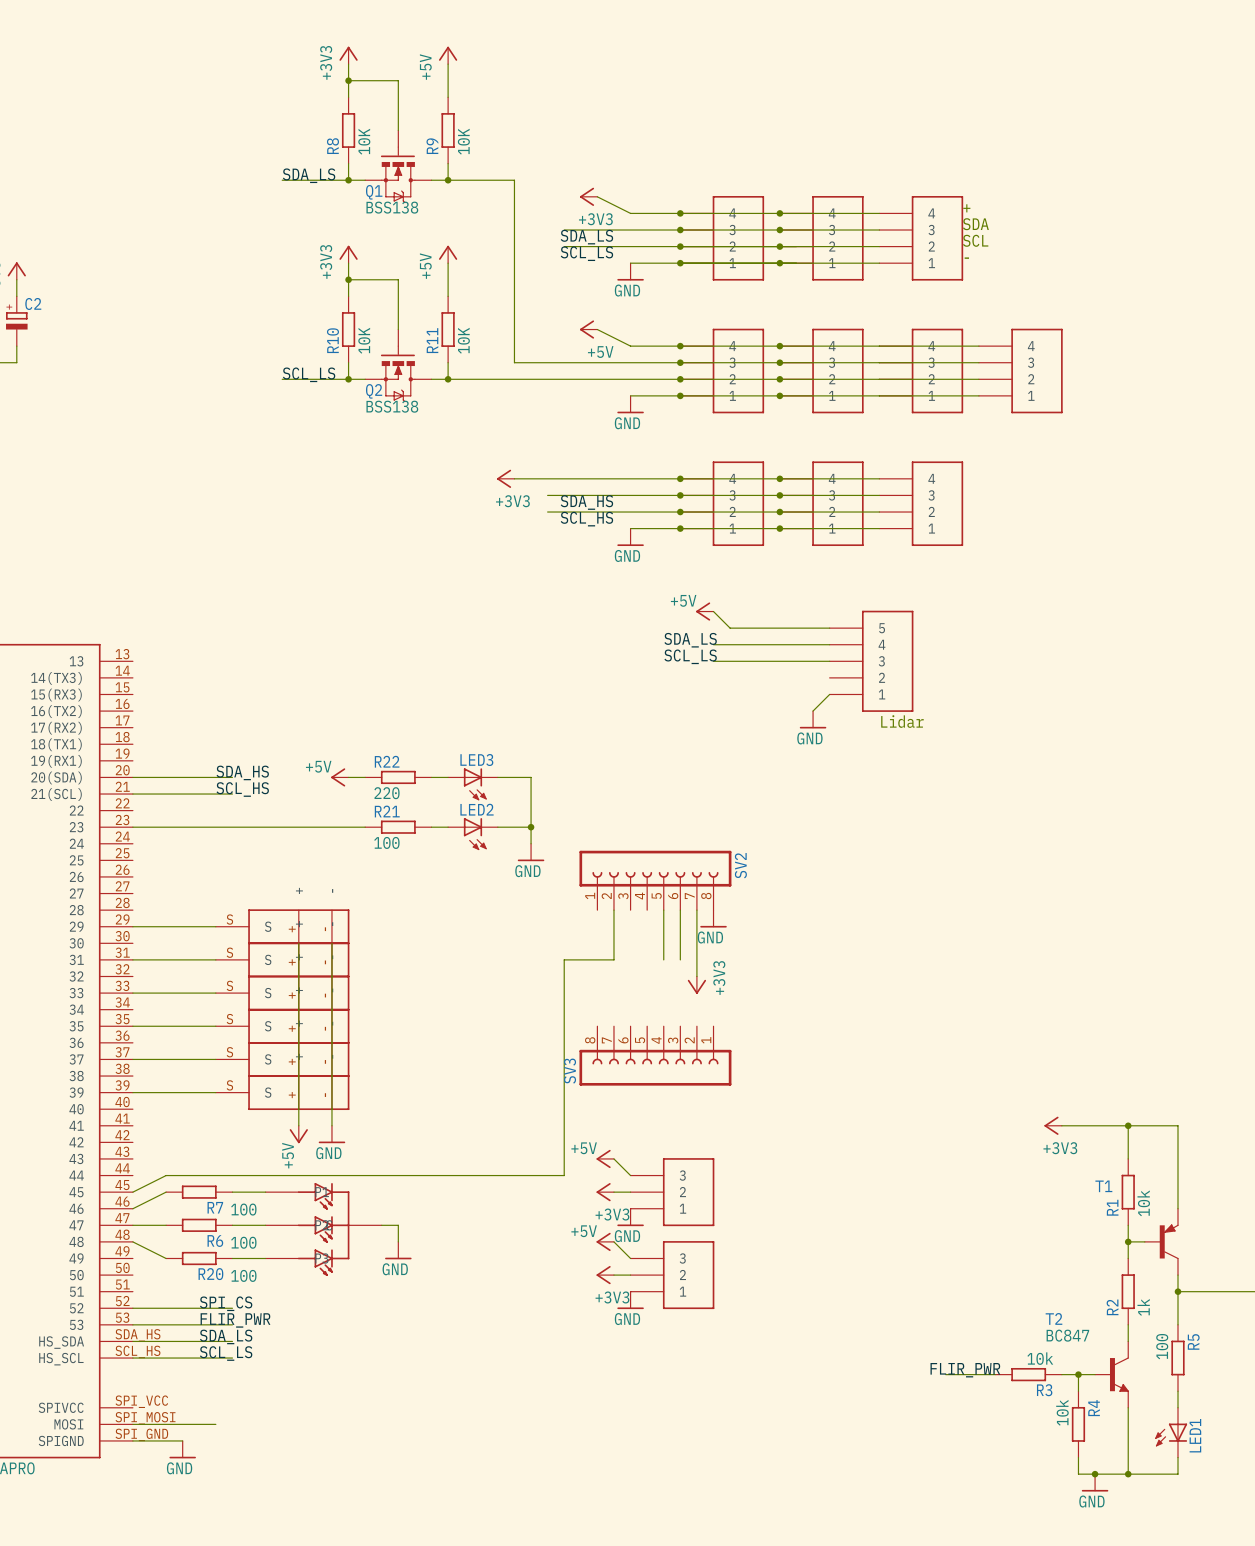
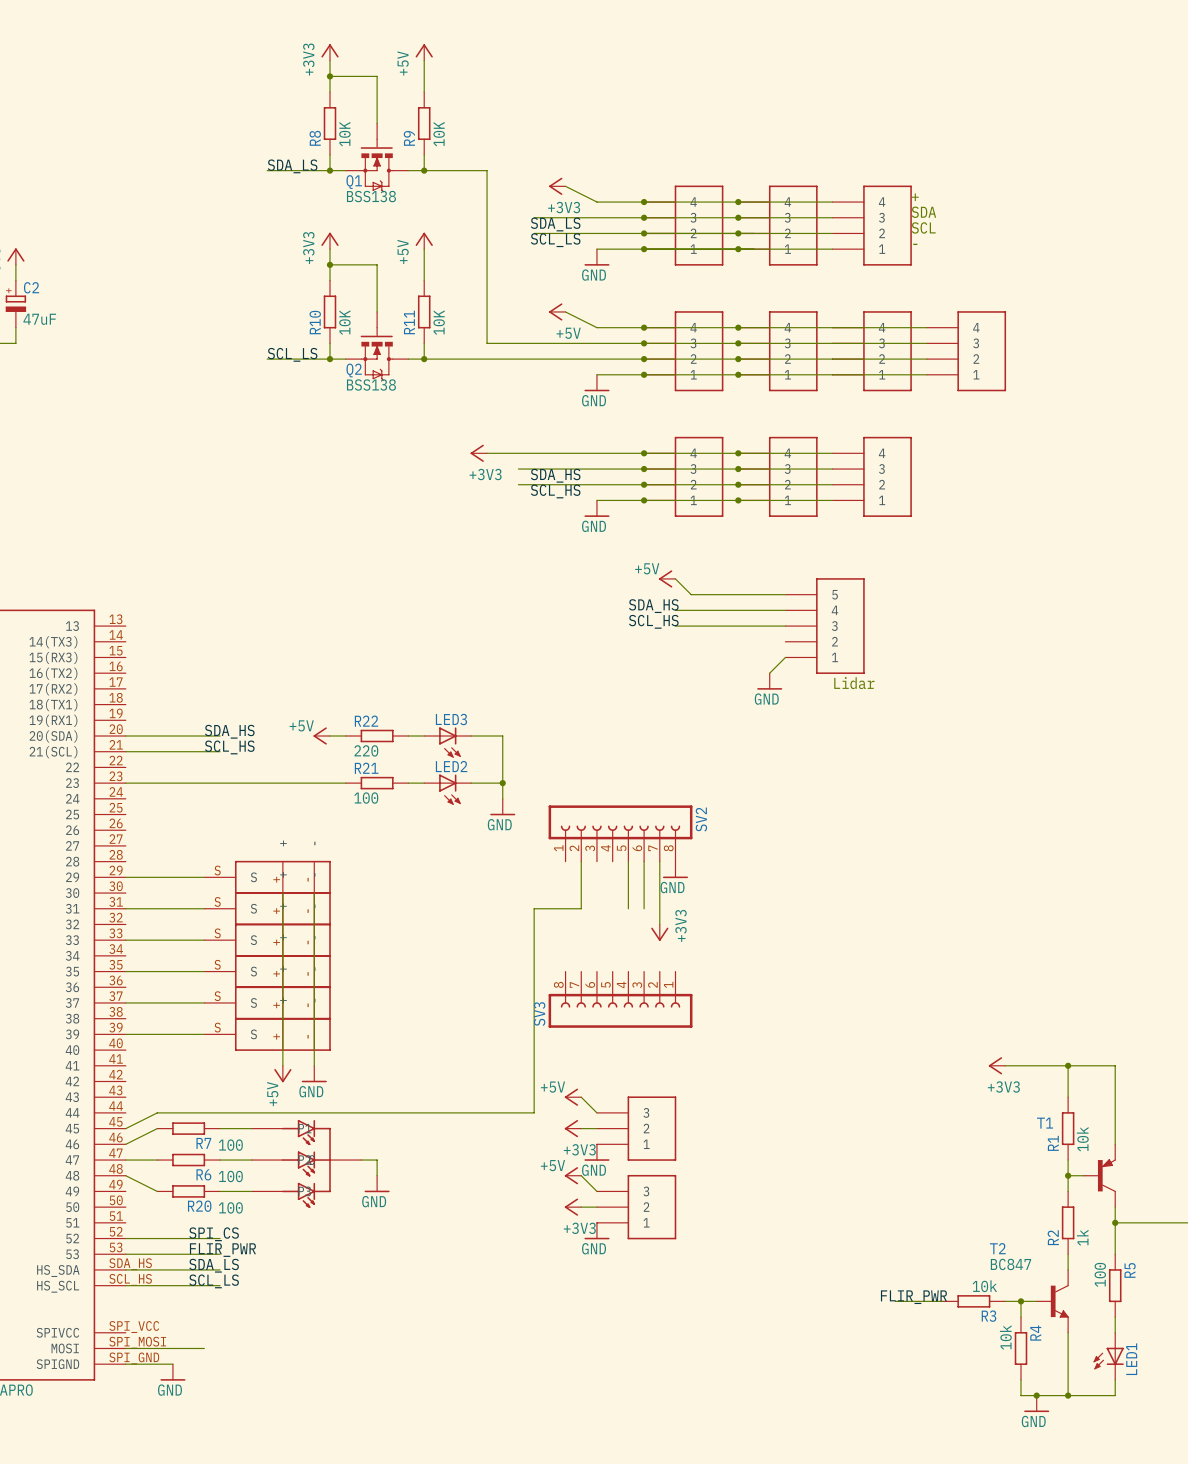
C2 value: none -> 47uF (39, 319)
label: SDA_LS (690, 640) -> SDA_HS (653, 606)
label: SCL_LS (690, 656) -> SCL_HS (653, 621)

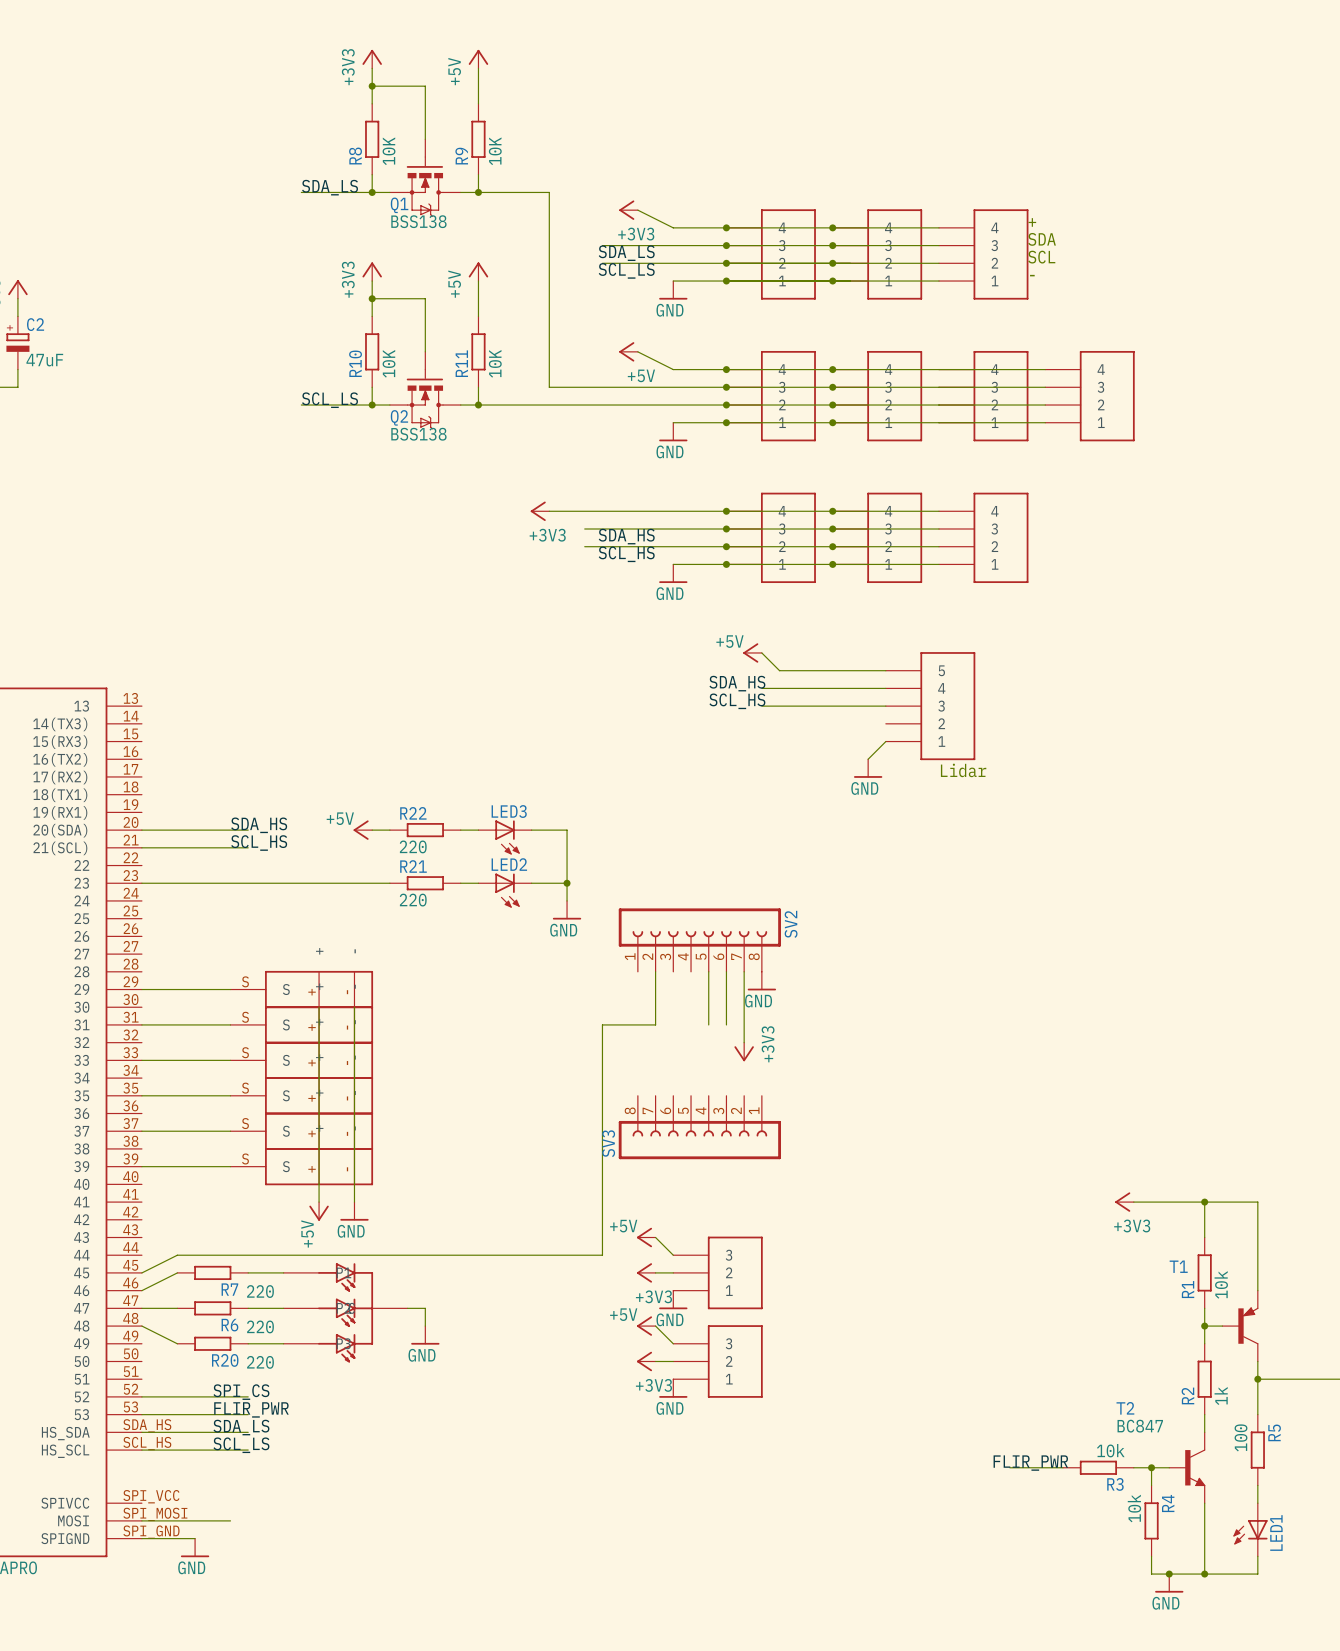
R21 value: 100 (366, 798) -> 220 (413, 900)
R7 value: 100 (230, 1145) -> 220 (260, 1291)
R6 value: 100 (230, 1176) -> 220 (260, 1326)
R20 value: 100 (230, 1207) -> 220 (260, 1362)

